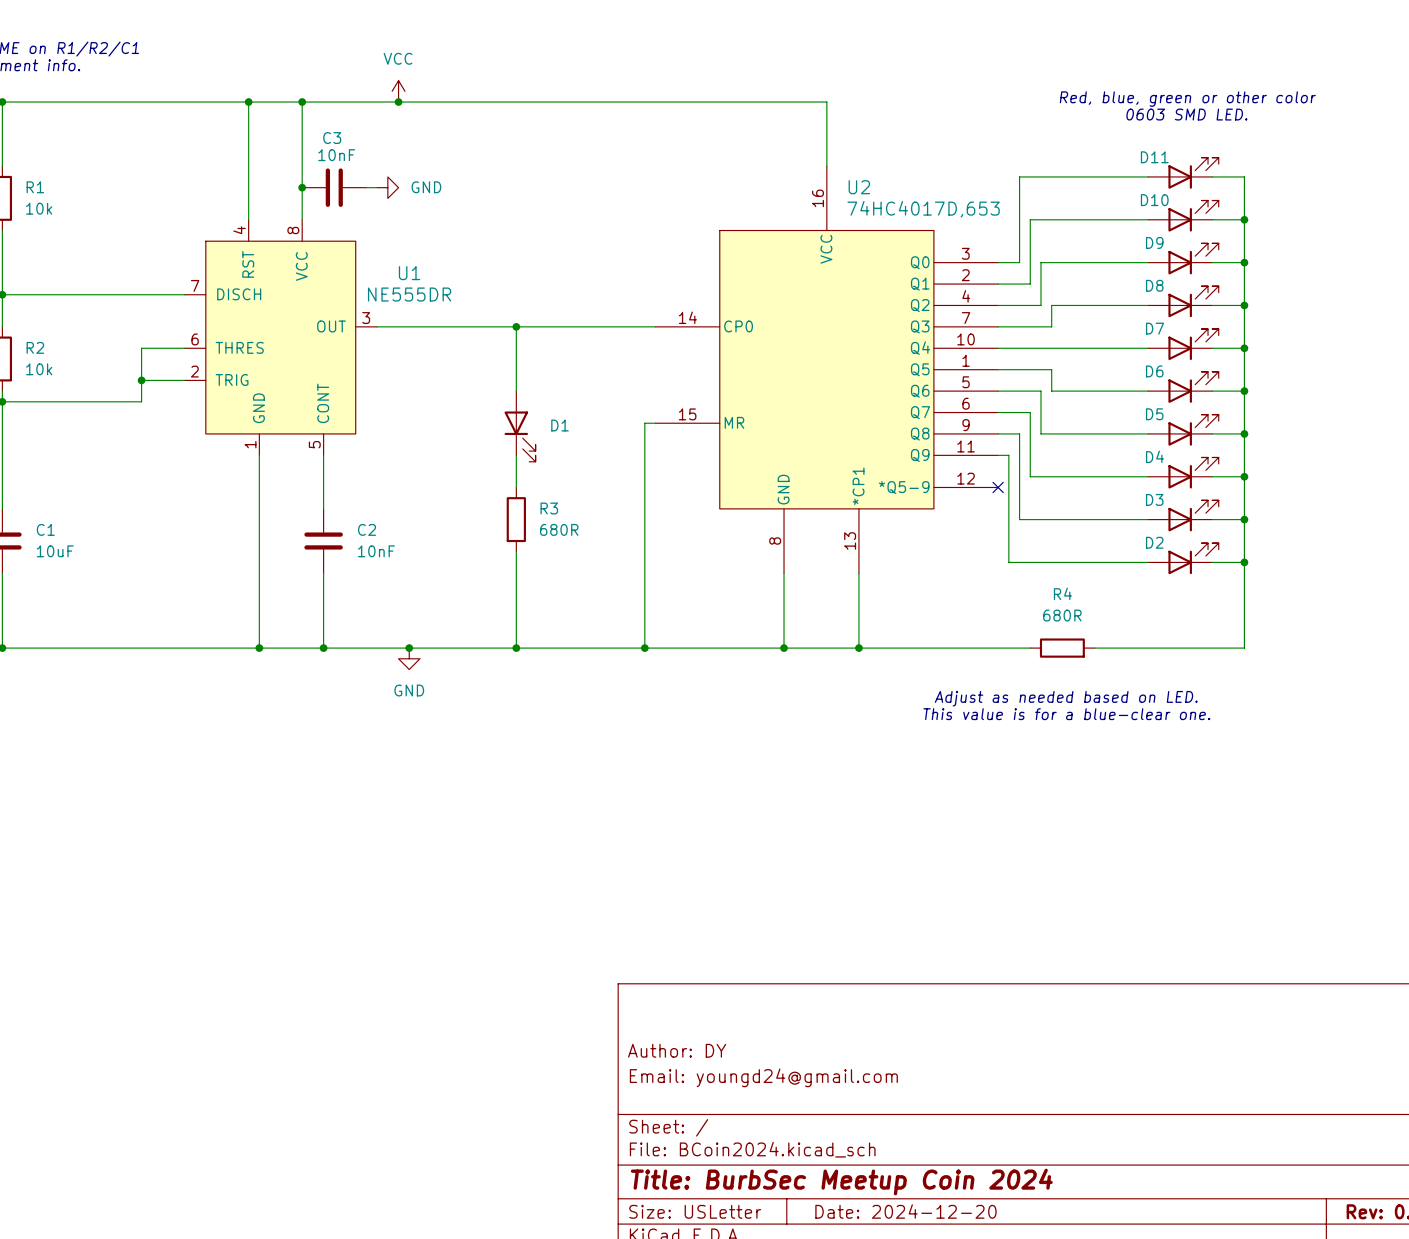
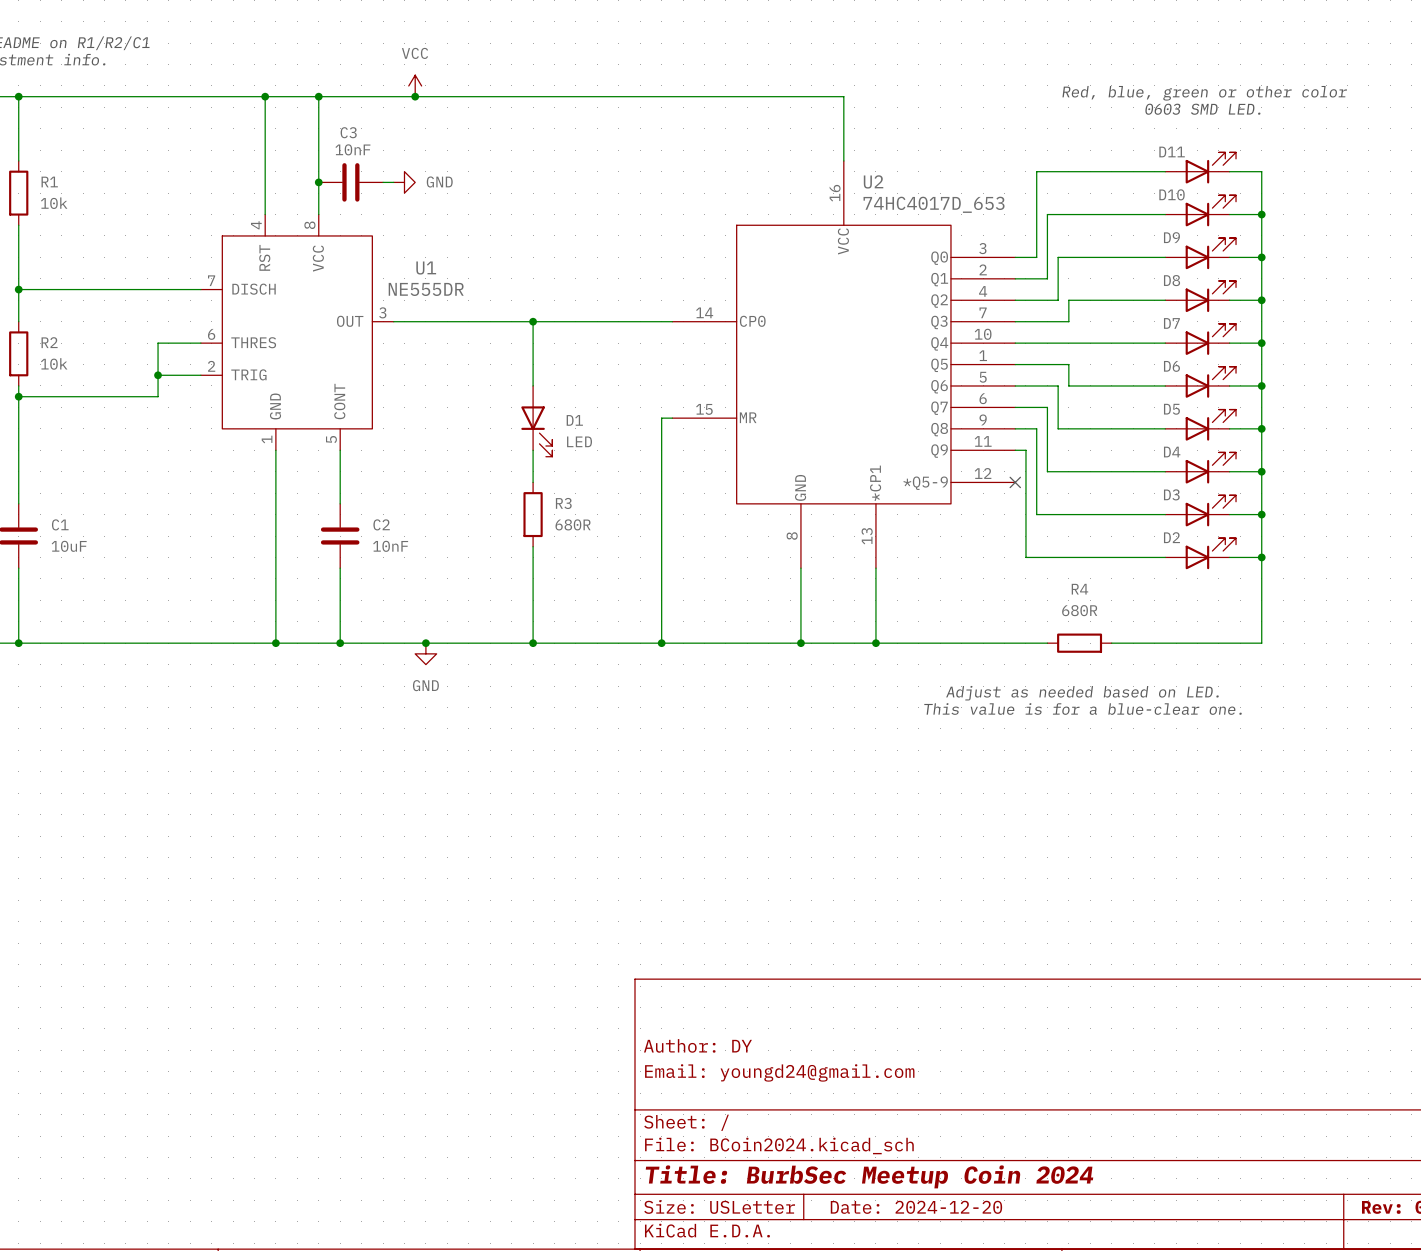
U2 value: 74HC4017D,653 (923, 209) -> 74HC4017D_653 (934, 204)
D1 value: none -> LED (579, 441)

